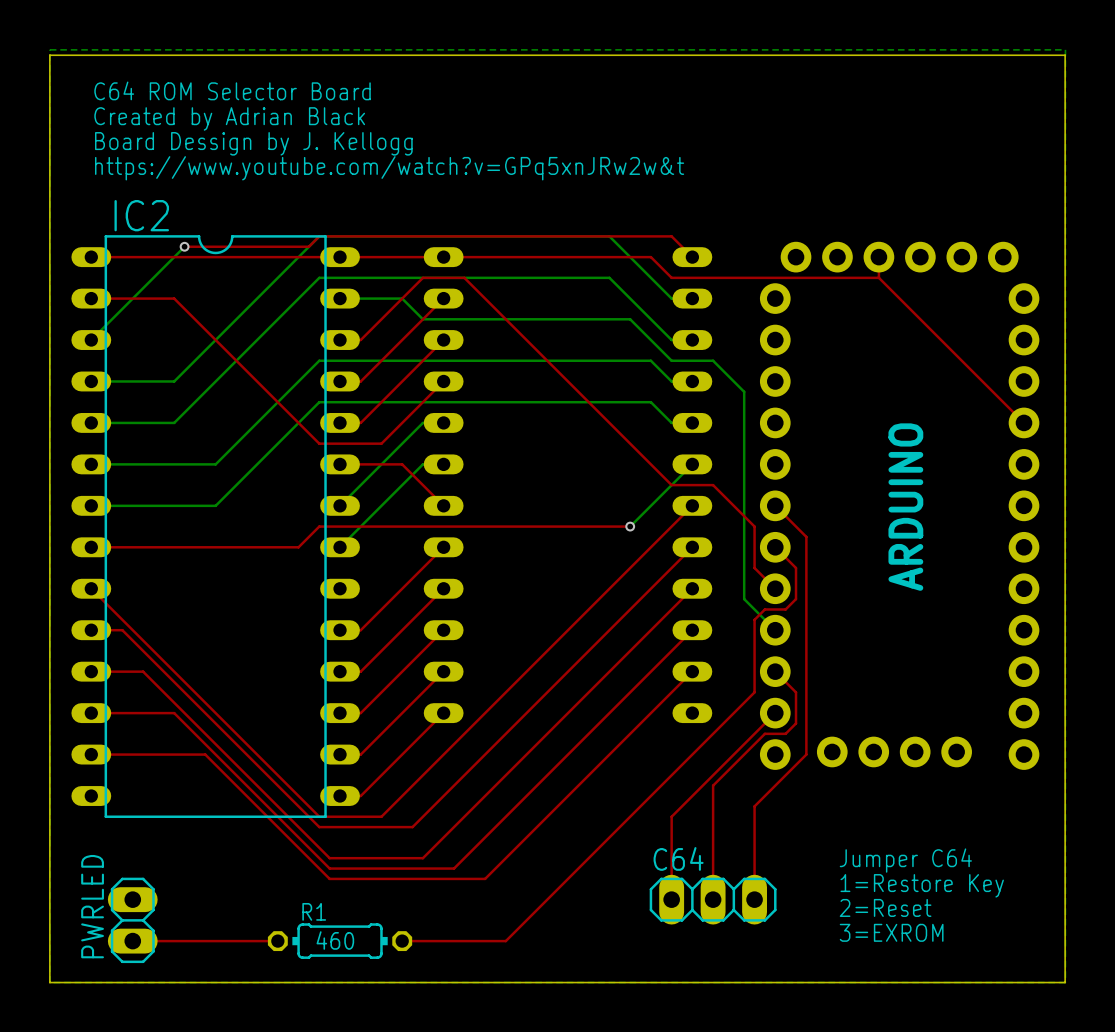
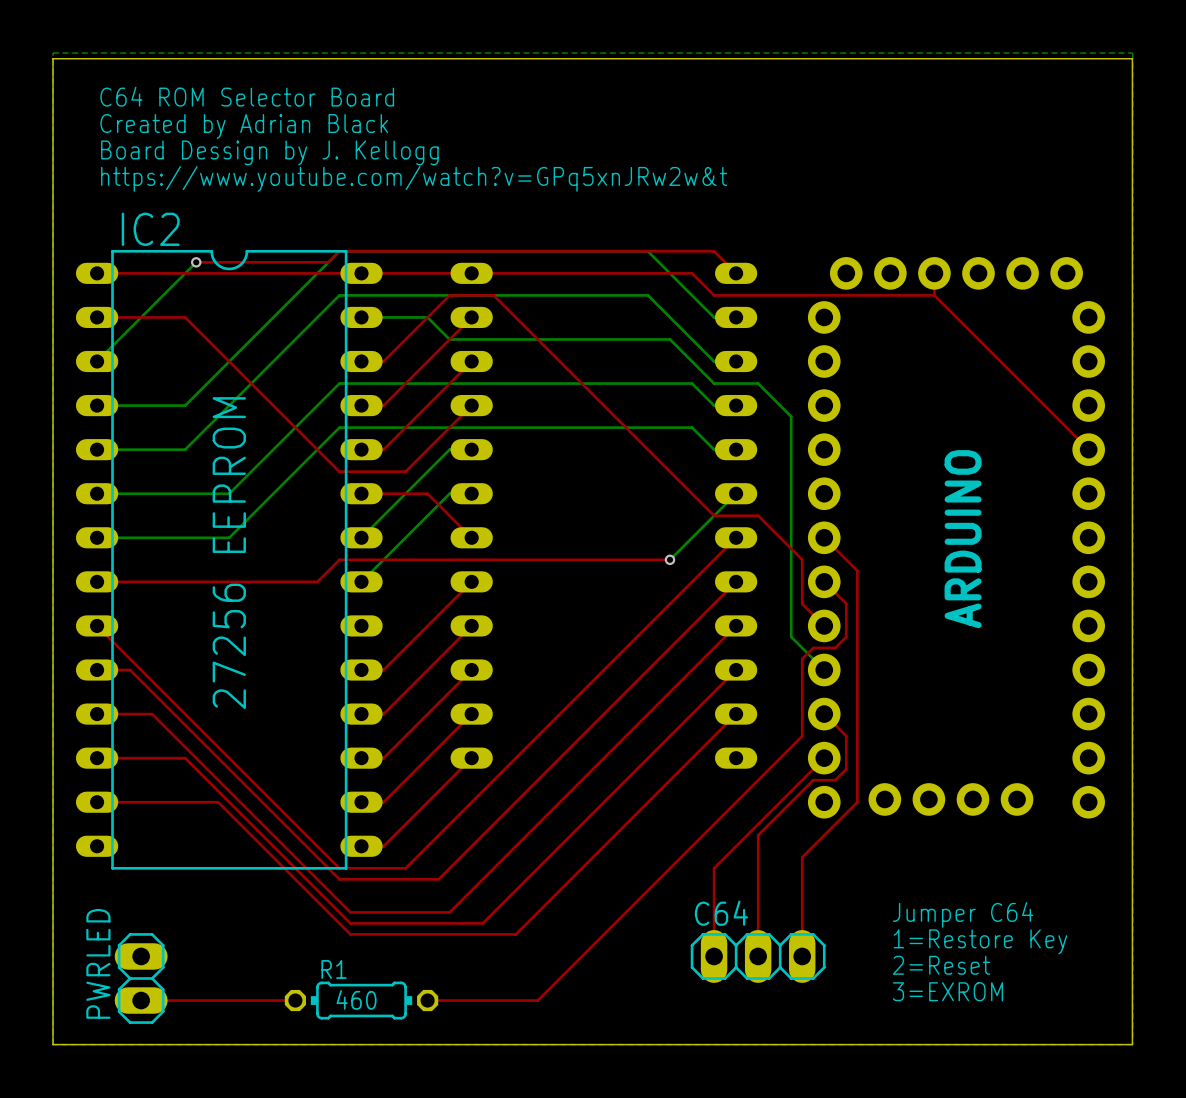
IC2 value: none -> 27256 EEPROM (229, 553)

